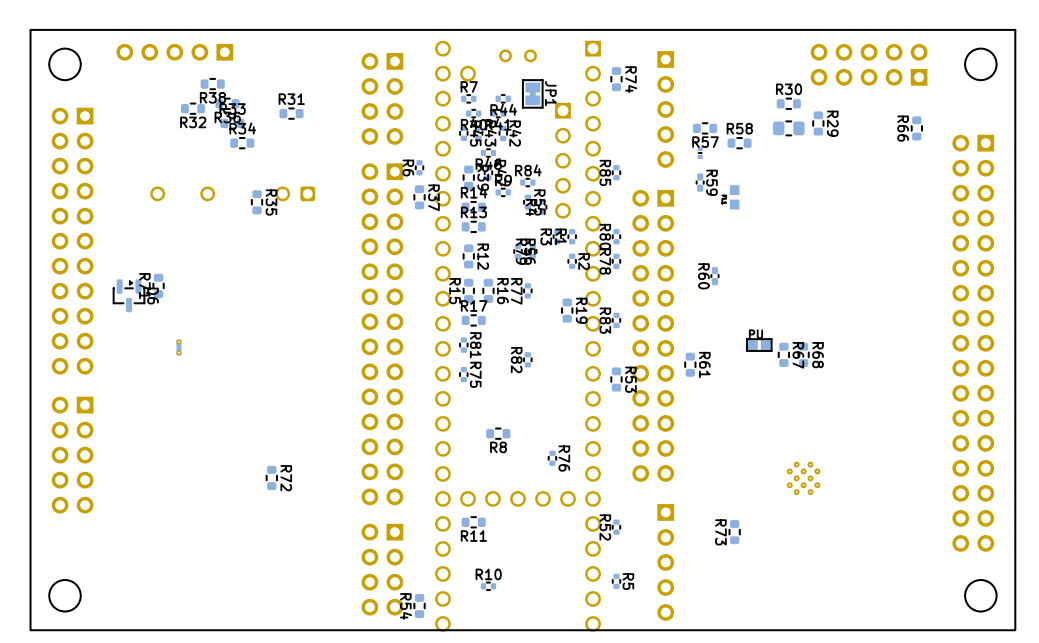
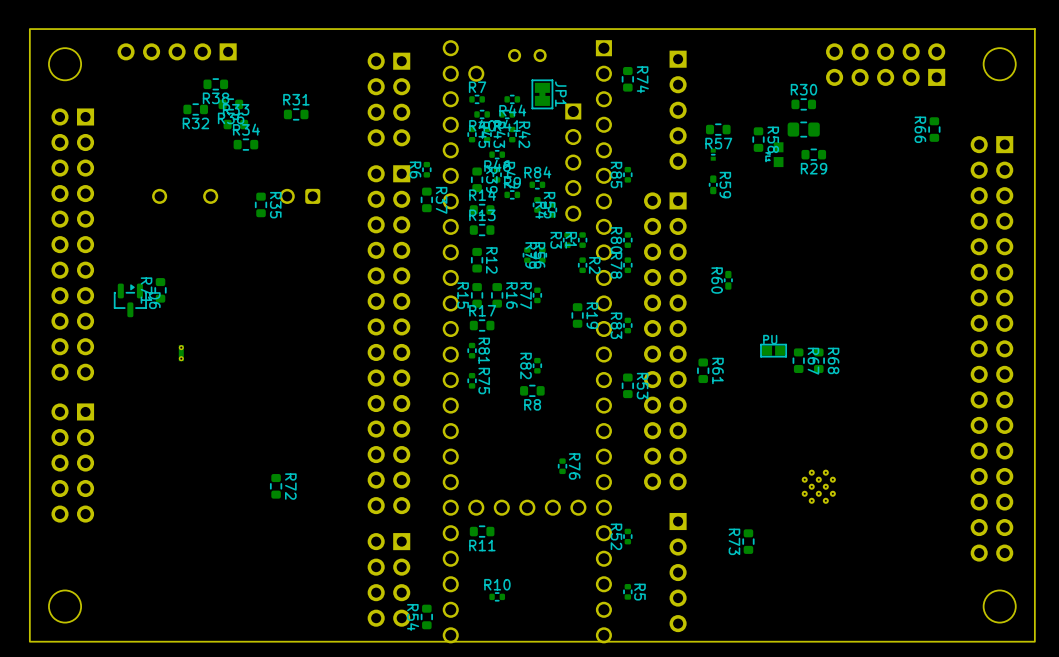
R29 rotation: 0° (818, 123) -> 90° clockwise (813, 154)
R29 position: (818, 123) -> (813, 154)
R58 rotation: 0° (739, 143) -> 90° clockwise (758, 139)
part position: (734, 197) -> (778, 154)
R8 position: (498, 433) -> (532, 390)

